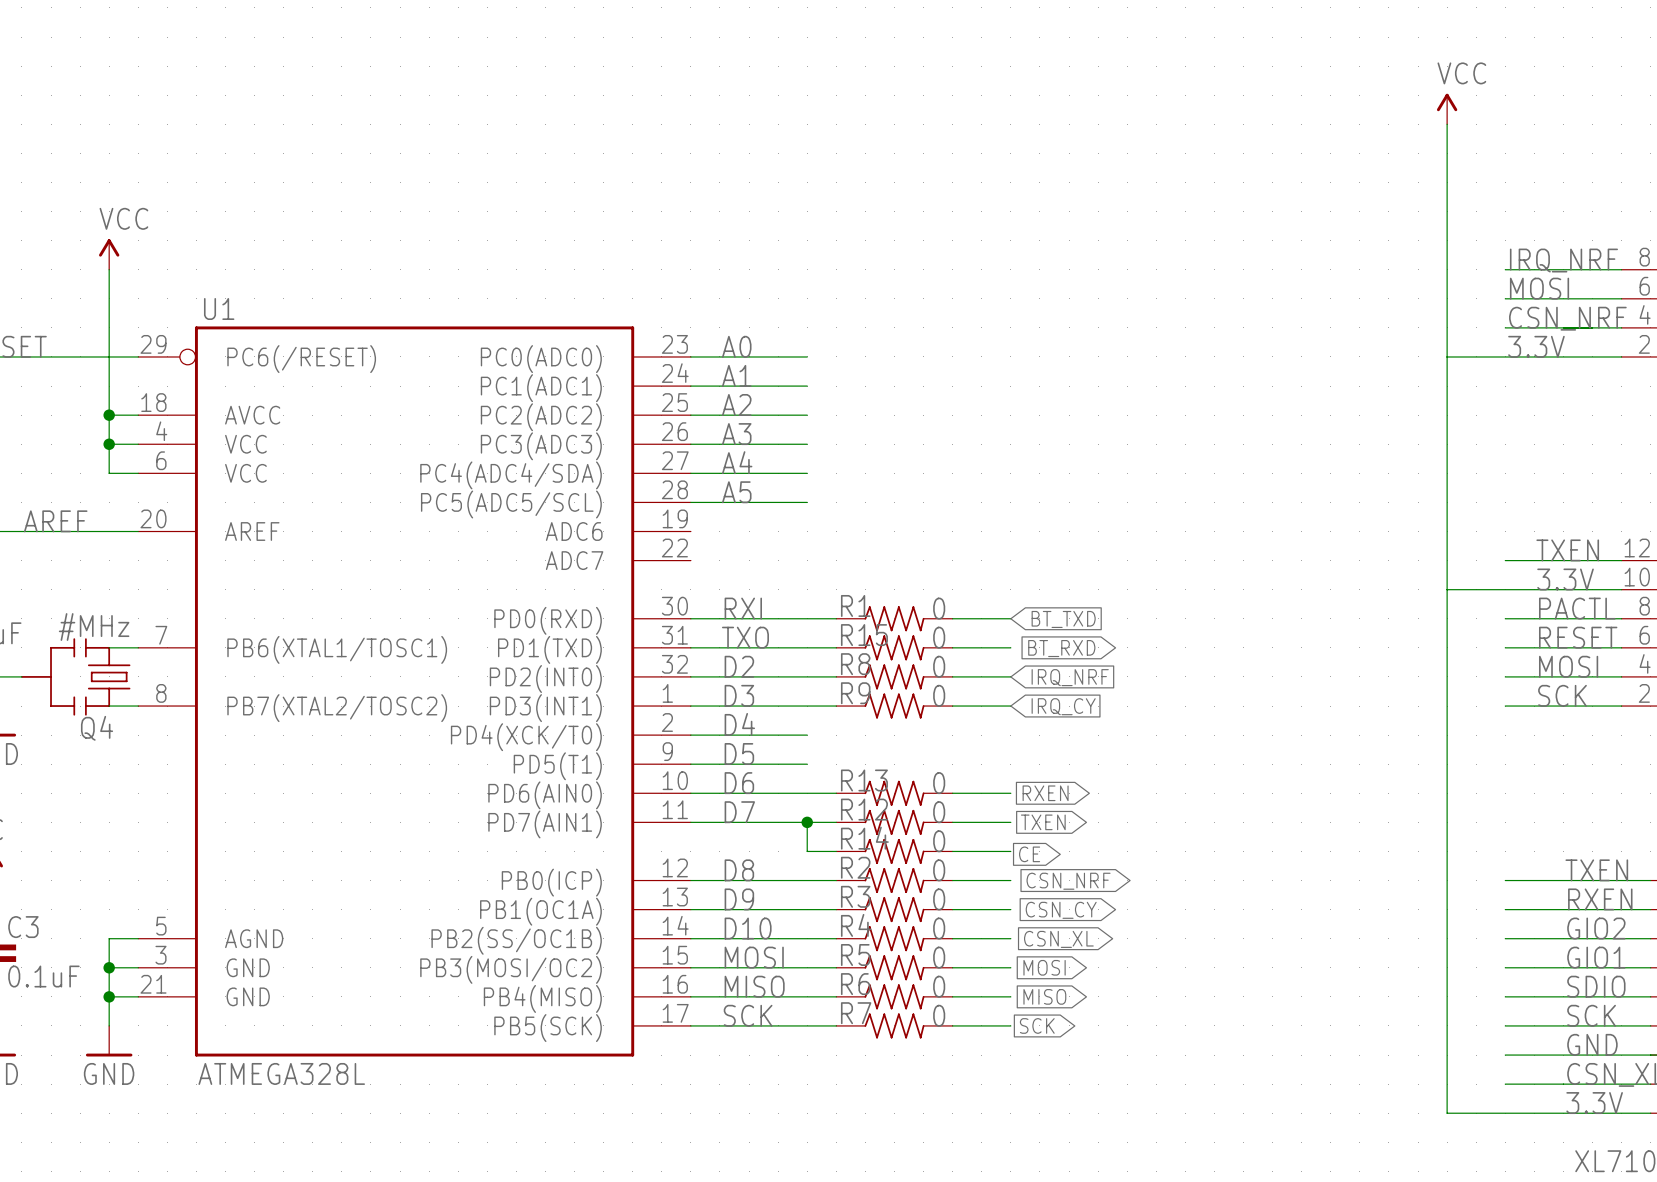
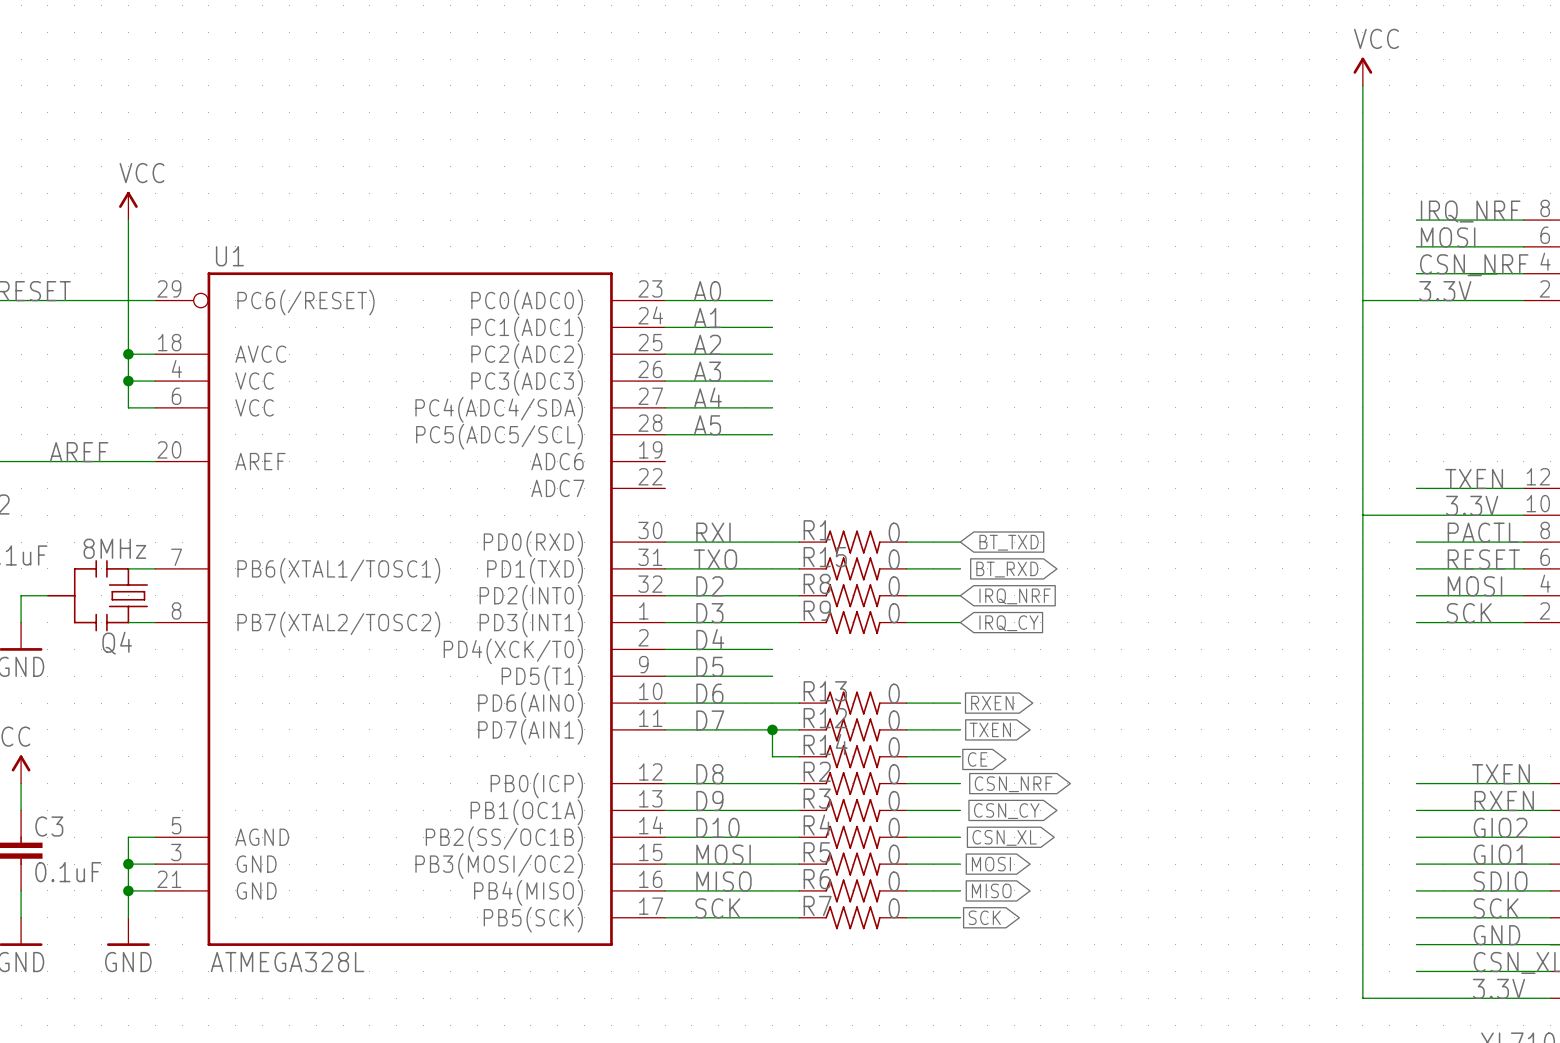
Q4 value: #MHz (94, 627) -> 8MHz (114, 548)

